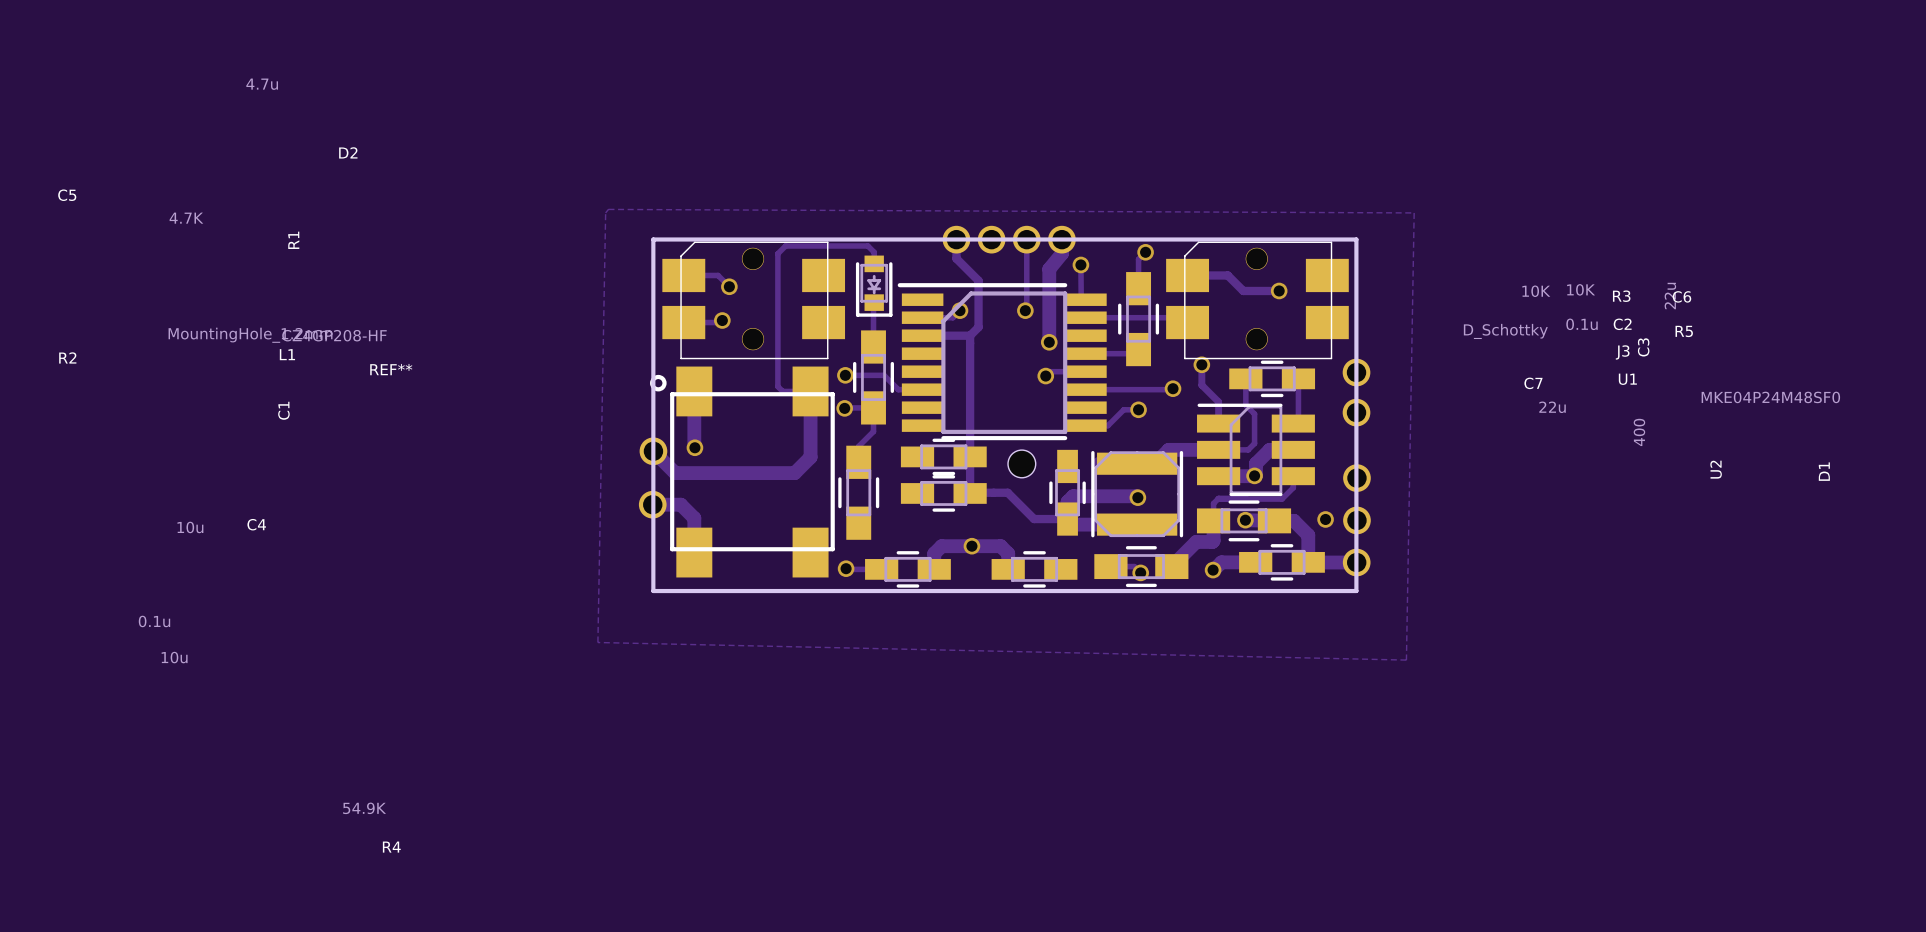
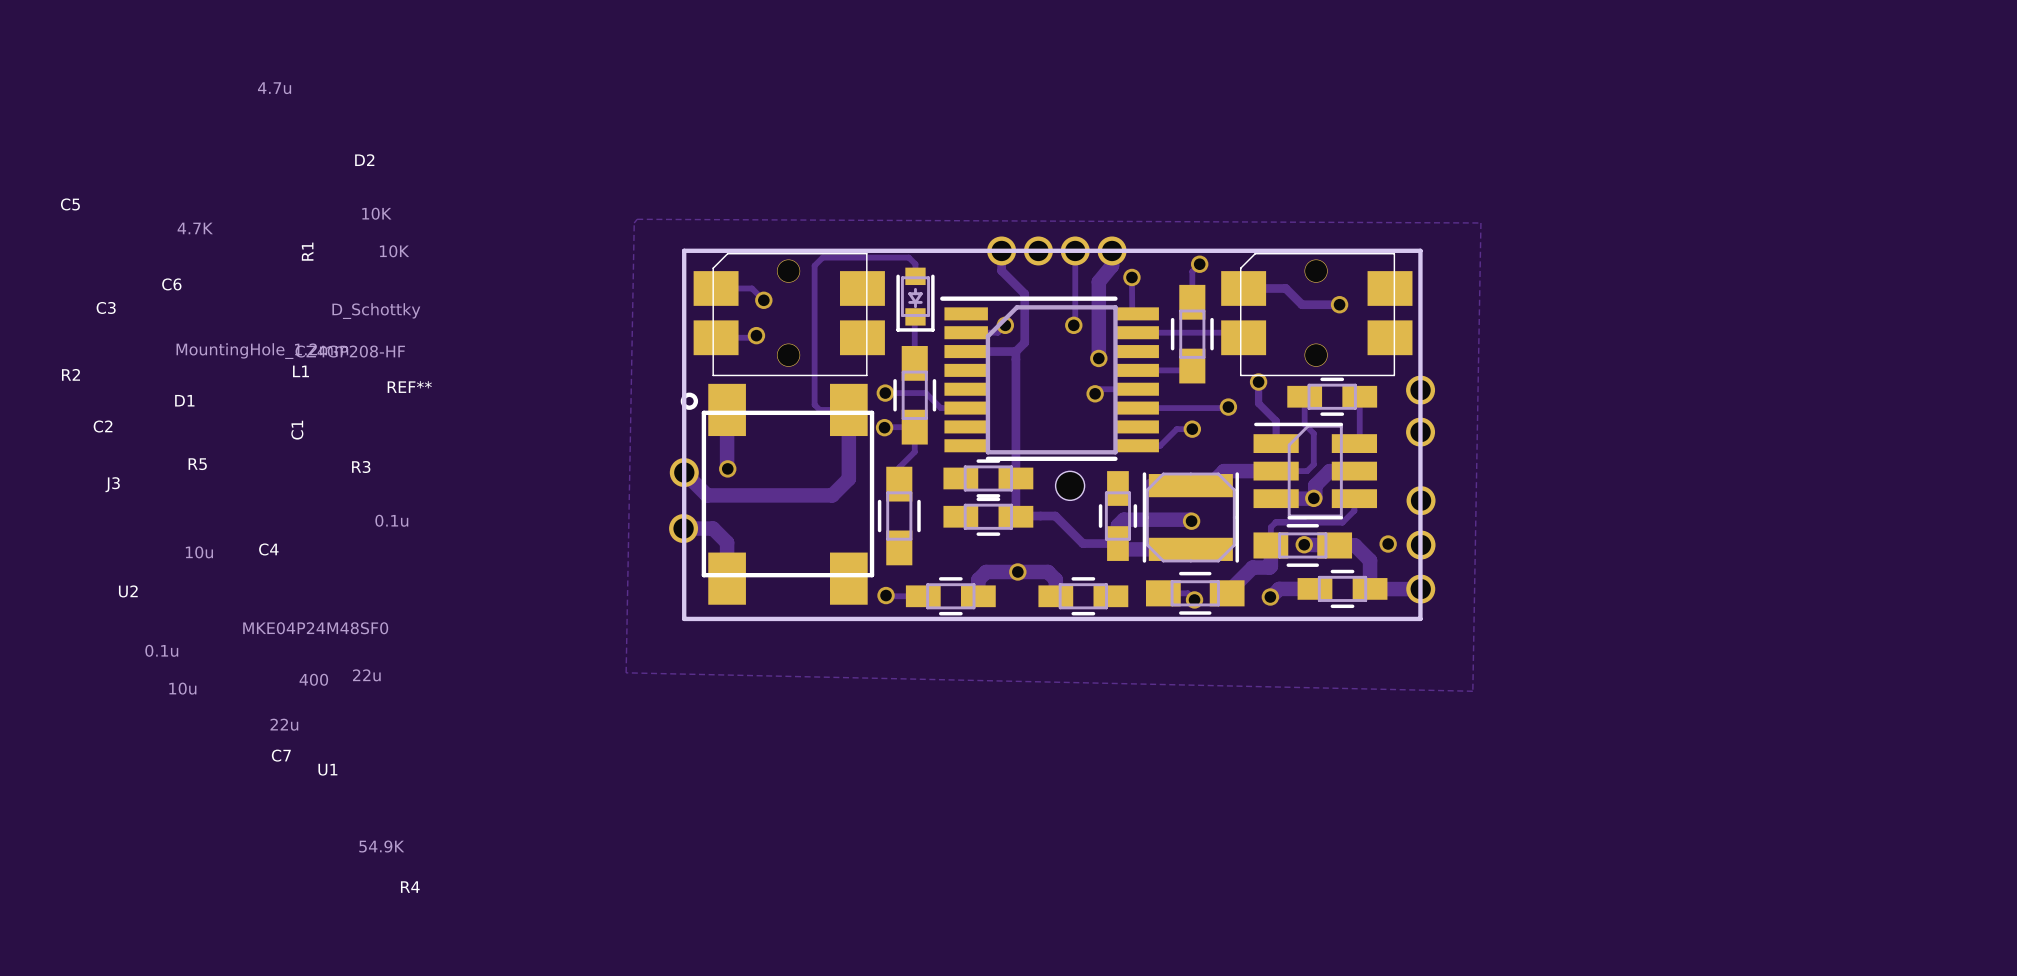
R3 value position: 10K (1581, 289) -> 10K (394, 251)
R1 value position: 10K (1536, 291) -> 10K (376, 213)
R3 name position: R3 (1621, 296) -> R3 (361, 467)
C3 value rotation: 0° (1670, 296) -> 90° clockwise (284, 724)
C3 value position: 22u (1670, 296) -> 22u (284, 724)
C6 name position: C6 (1681, 296) -> C6 (171, 284)
C2 value position: 0.1u (1582, 324) -> 0.1u (391, 520)
C2 name position: C2 (1622, 324) -> C2 (103, 426)
D1 value position: D_Schottky (1505, 331) -> D_Schottky (376, 311)
R5 name position: R5 (1684, 331) -> R5 (197, 464)
C3 name rotation: 0° (1643, 347) -> 90° clockwise (106, 307)
C3 name position: C3 (1643, 347) -> C3 (106, 307)
J3 name position: J3 (1622, 352) -> J3 (112, 484)
U1 name position: U1 (1627, 379) -> U1 (327, 769)
C7 name position: C7 (1533, 383) -> C7 (281, 755)
U2 value position: MKE04P24M48SF0 (1770, 397) -> MKE04P24M48SF0 (315, 628)
C7 value position: 22u (1552, 407) -> 22u (366, 675)
R5 value rotation: 0° (1639, 432) -> 90° clockwise (313, 679)
R5 value position: 400 (1639, 432) -> 400 (313, 679)
U2 name rotation: 0° (1716, 469) -> 90° clockwise (128, 591)
U2 name position: U2 (1716, 469) -> U2 (128, 591)
D1 name rotation: 0° (1824, 471) -> 90° clockwise (184, 400)
D1 name position: D1 (1824, 471) -> D1 (184, 400)

